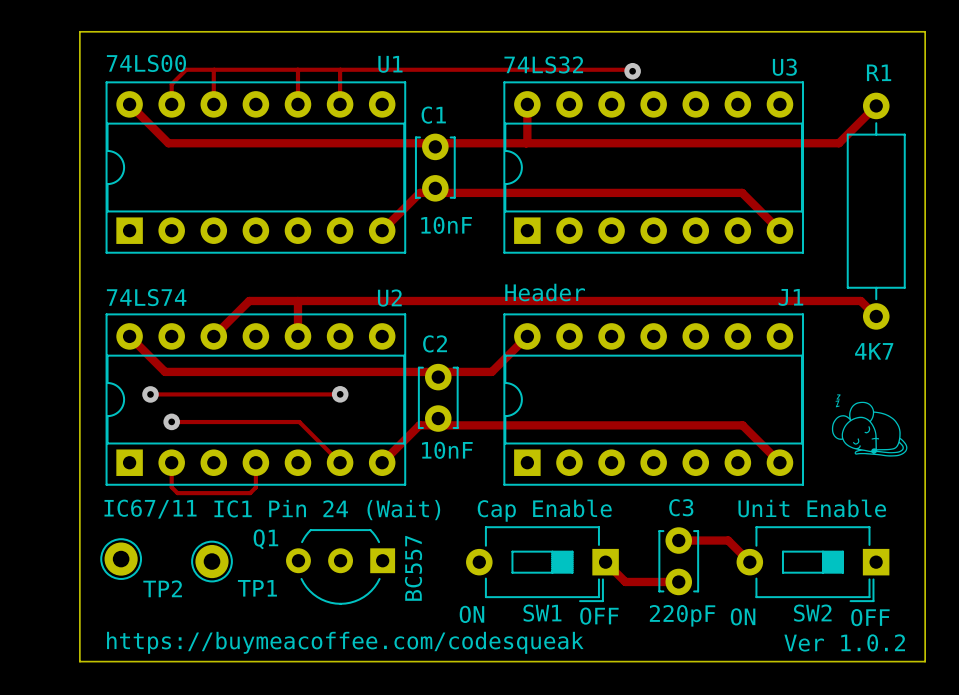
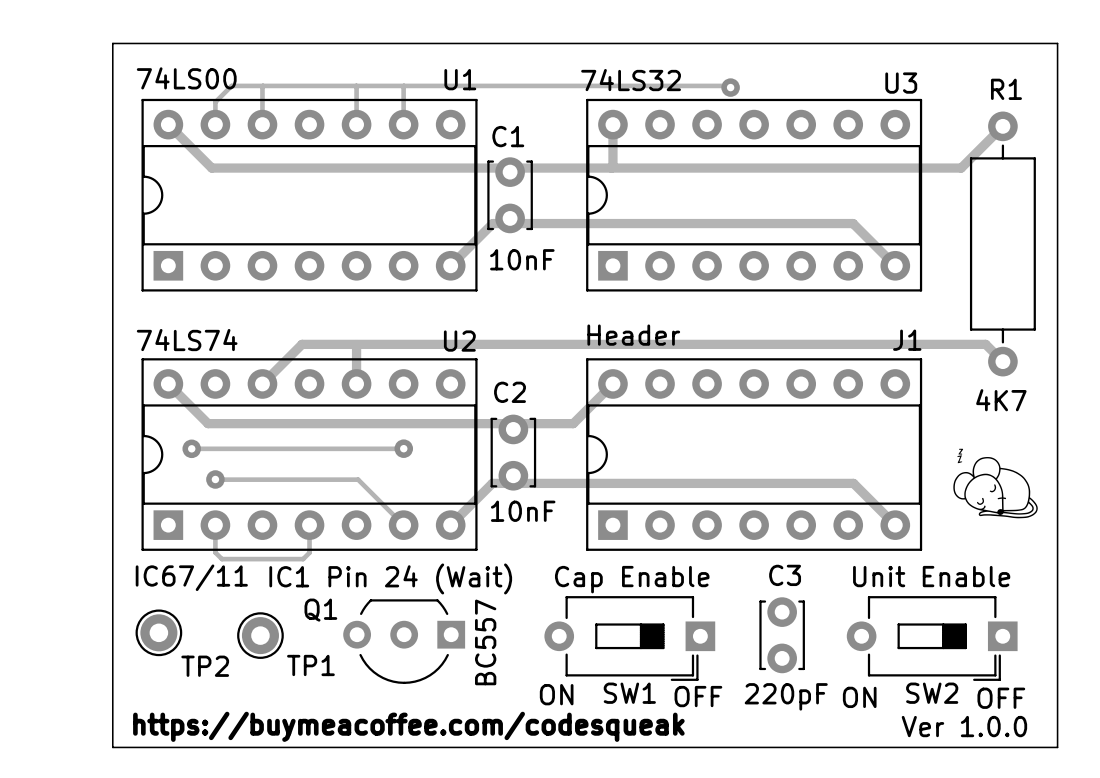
track: (678, 540) (728, 540) (749, 562) -> none
track: (605, 562) (625, 581) (678, 581) -> none
text: Ver 1.0.2 (844, 642) -> Ver 1.0.0 (964, 726)

